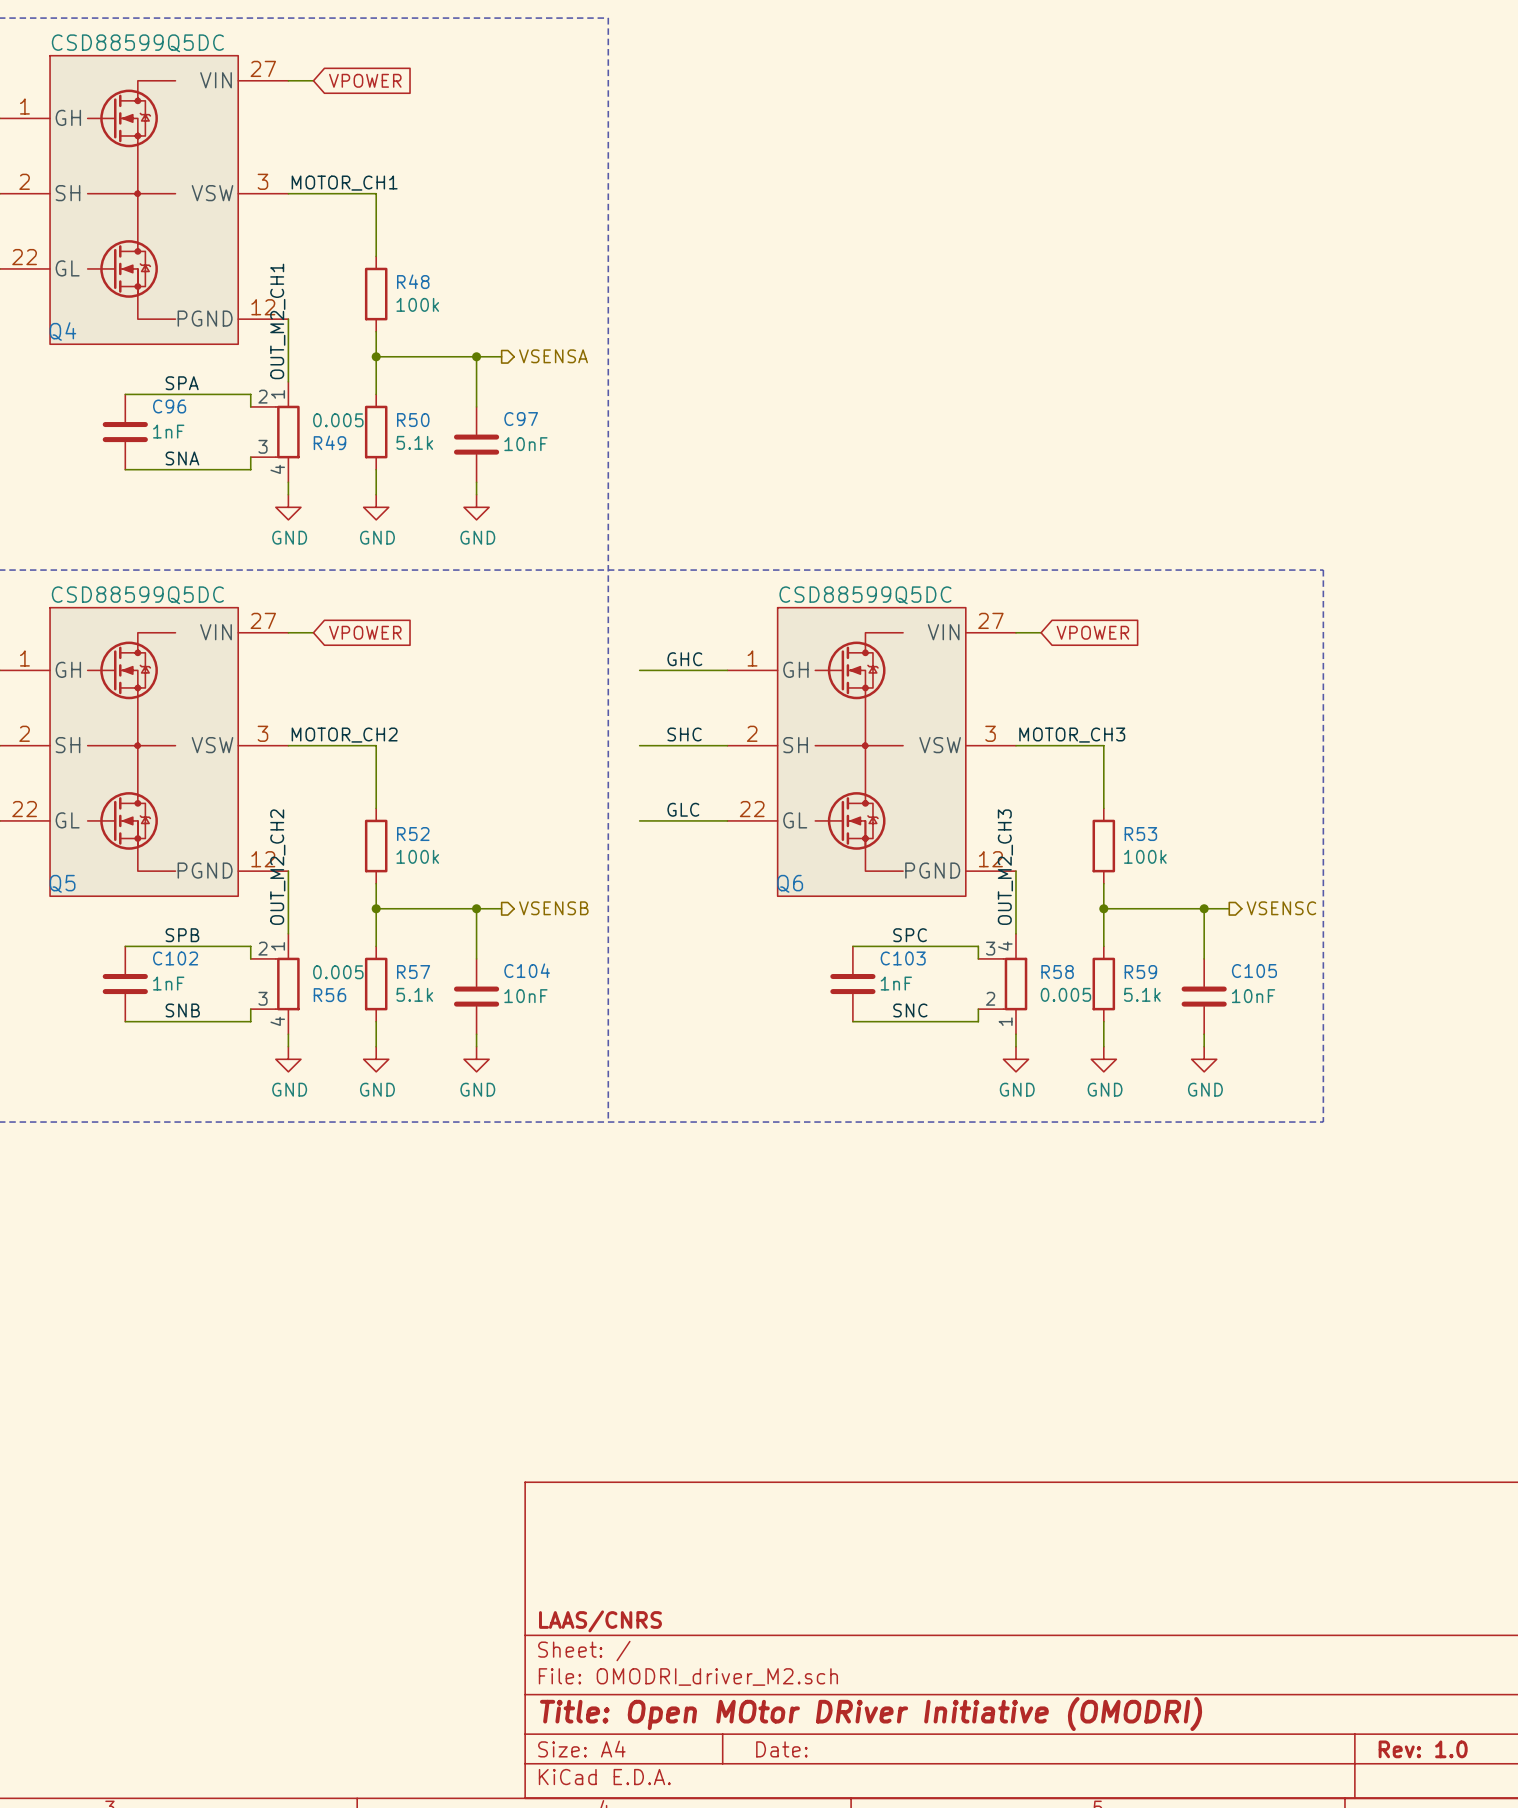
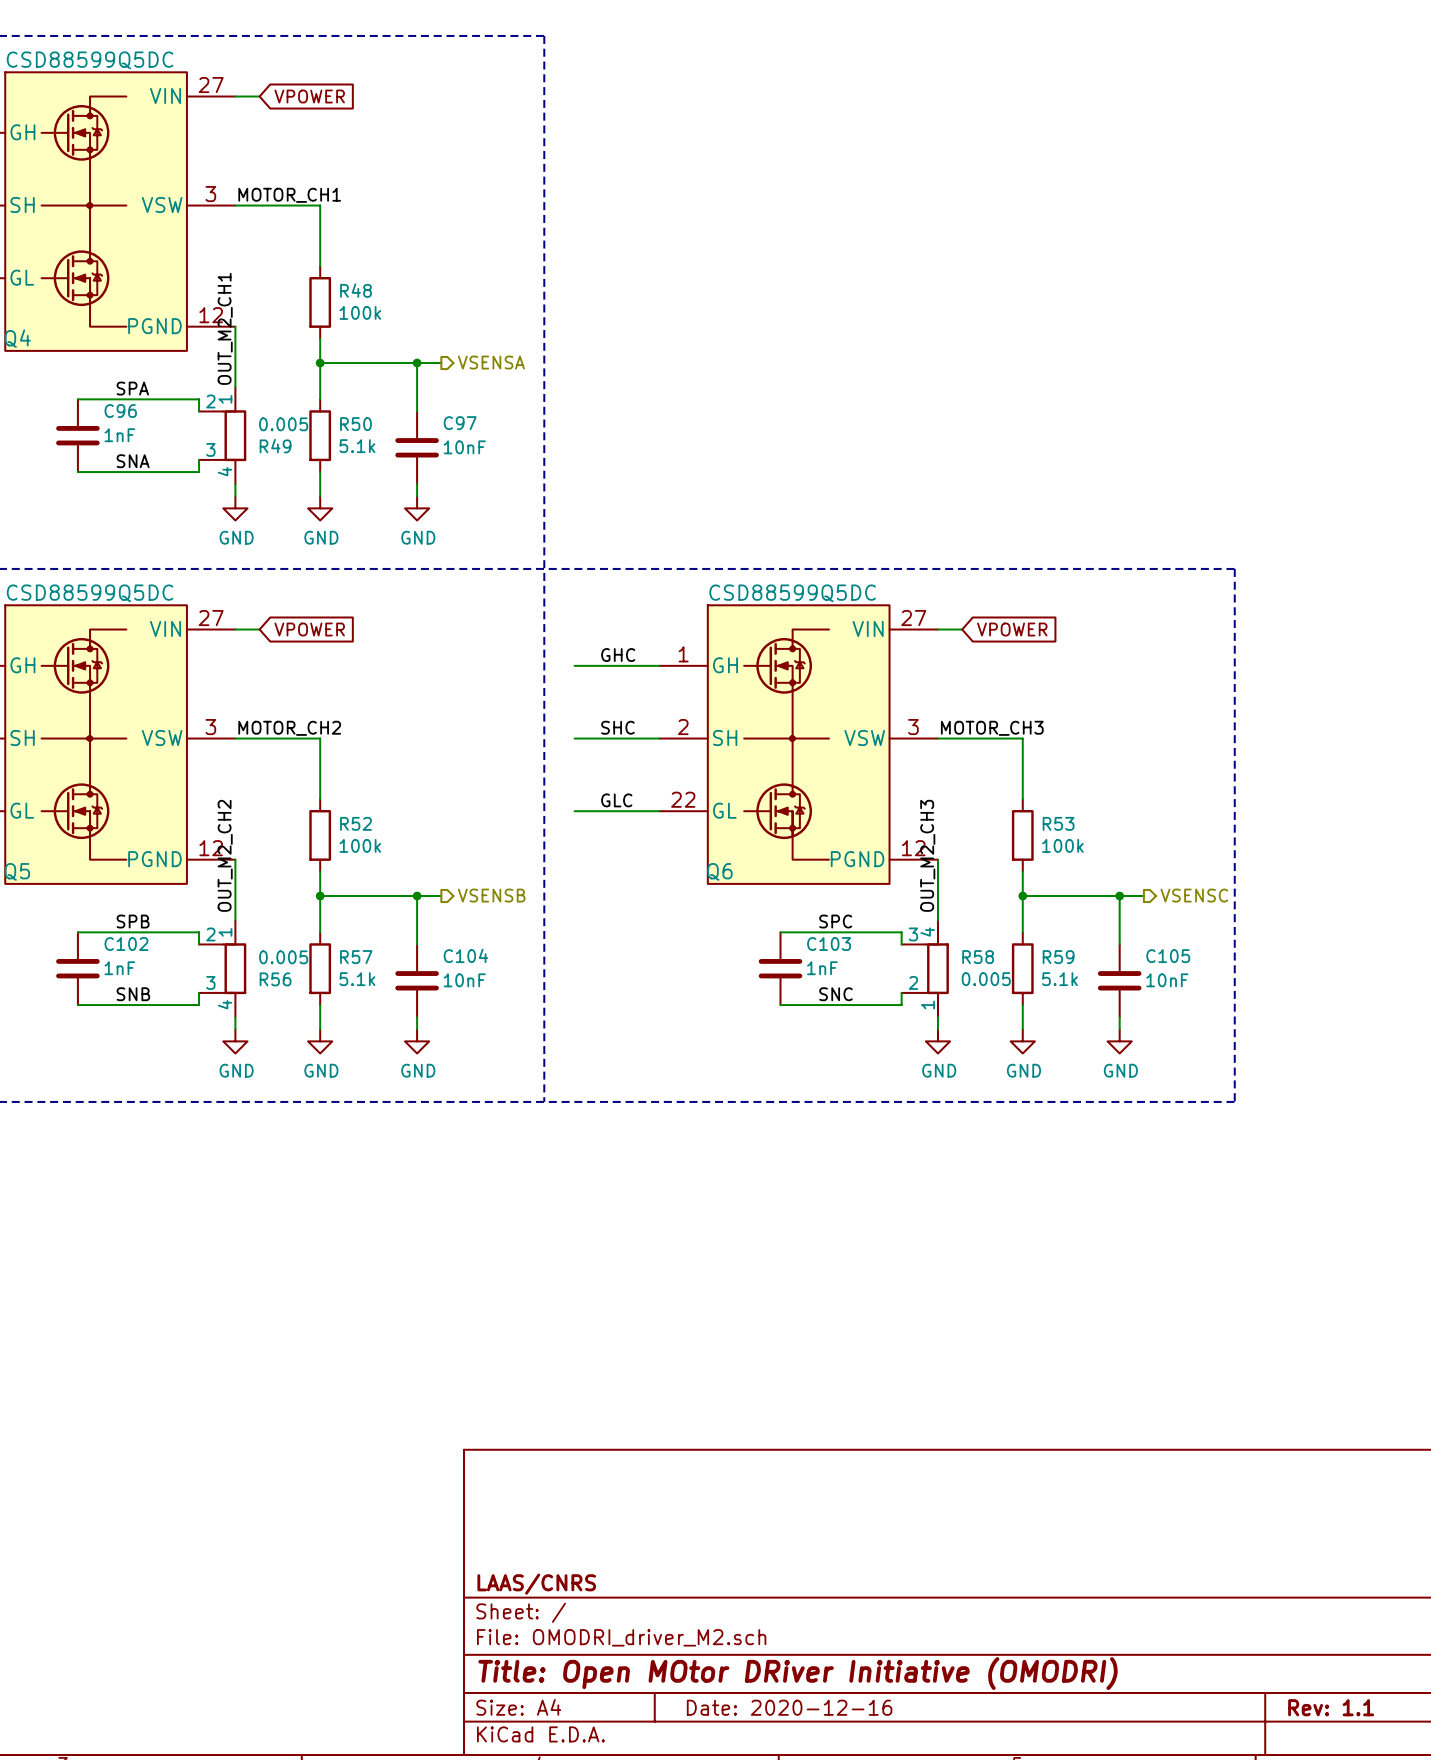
title block: Date: (781, 1749) -> Date: 2020-12-16 (789, 1707)
title block: Rev: 1.0 (1423, 1749) -> Rev: 1.1 (1331, 1707)

